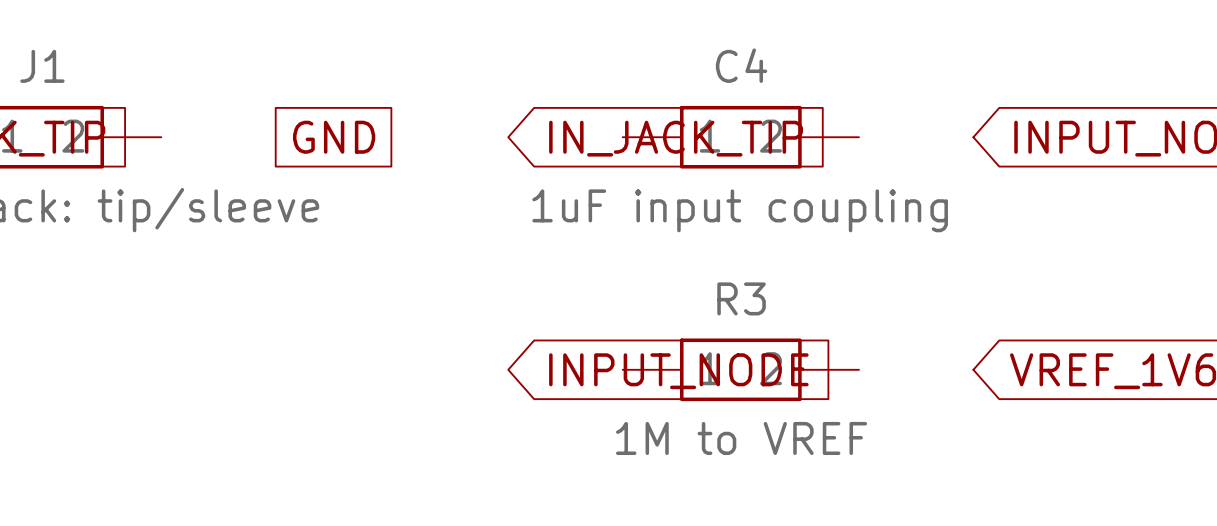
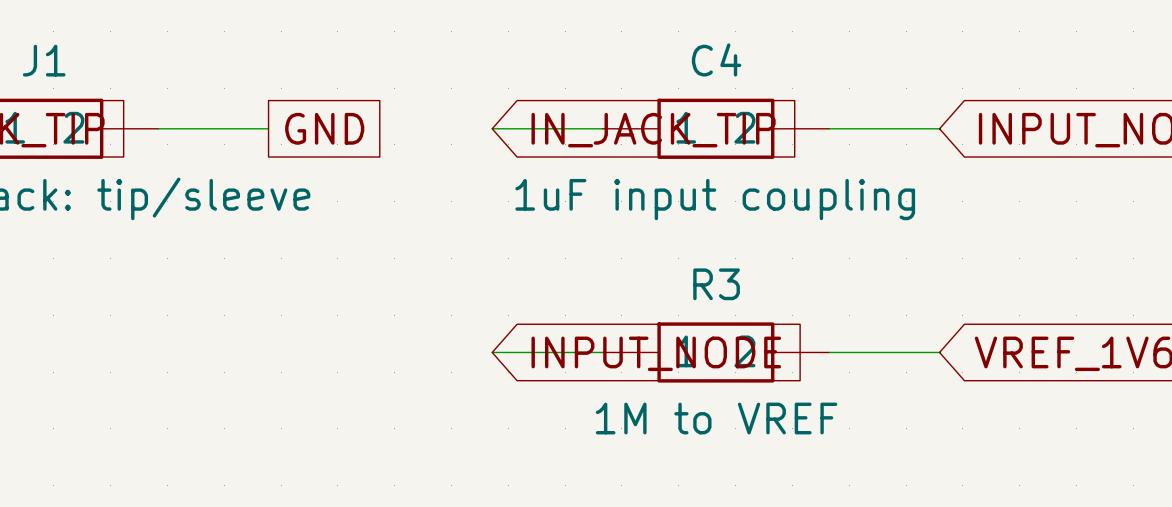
wire: none -> (158, 128) (268, 128)
wire: none -> (492, 128) (602, 128)
wire: none -> (829, 128) (939, 128)
wire: none -> (492, 352) (602, 352)
wire: none -> (829, 352) (939, 352)

